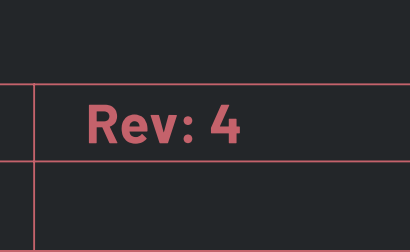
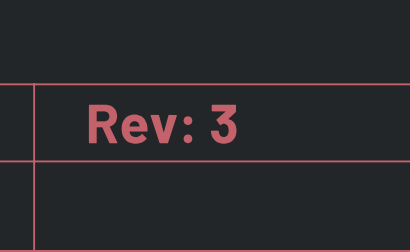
title block: Rev: 4 (164, 124) -> Rev: 3 (162, 124)

